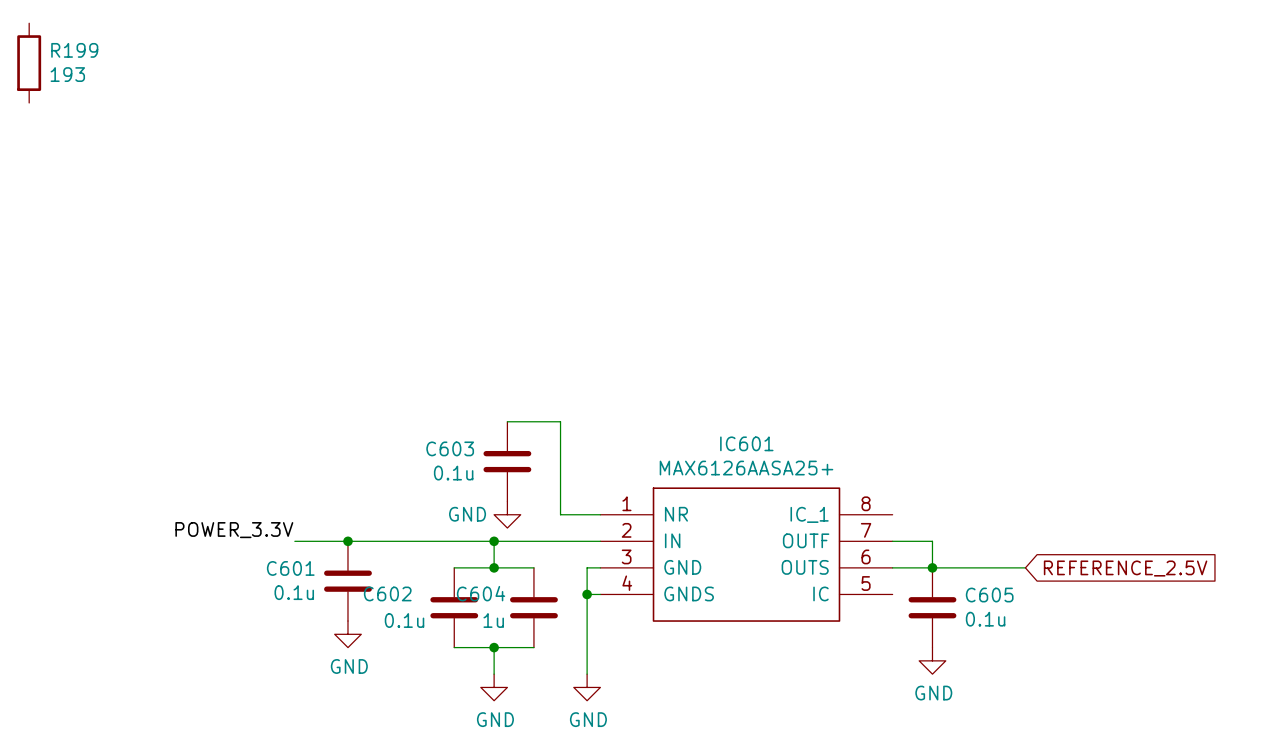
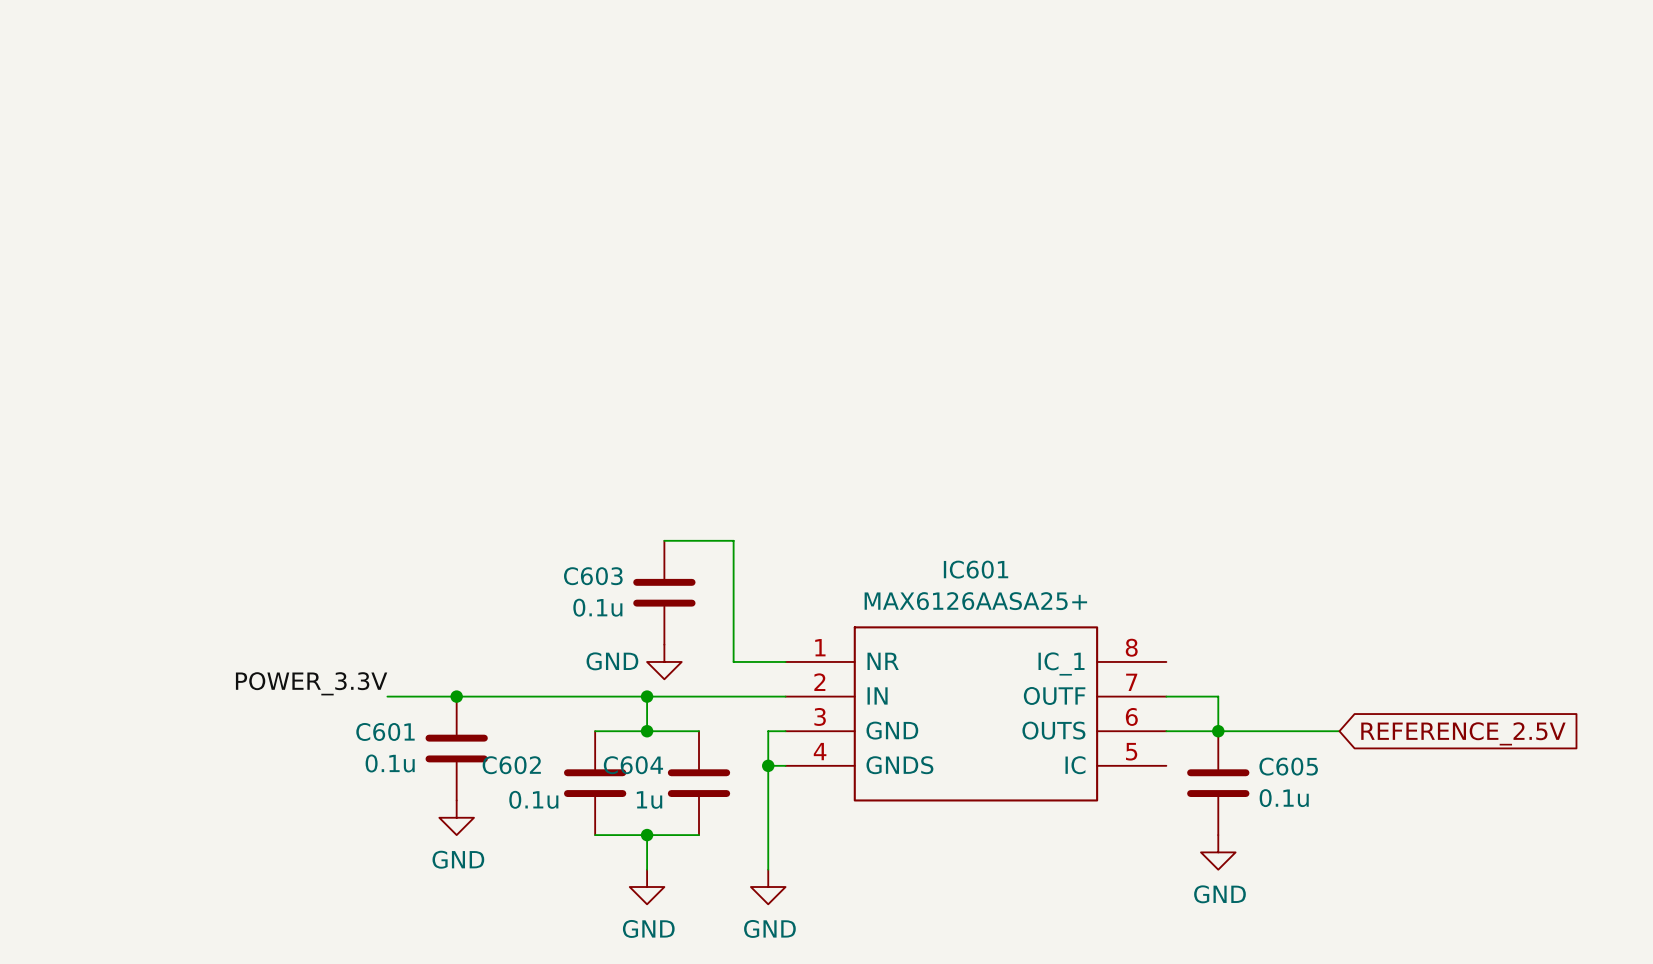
R199: 193 (29, 63) -> none

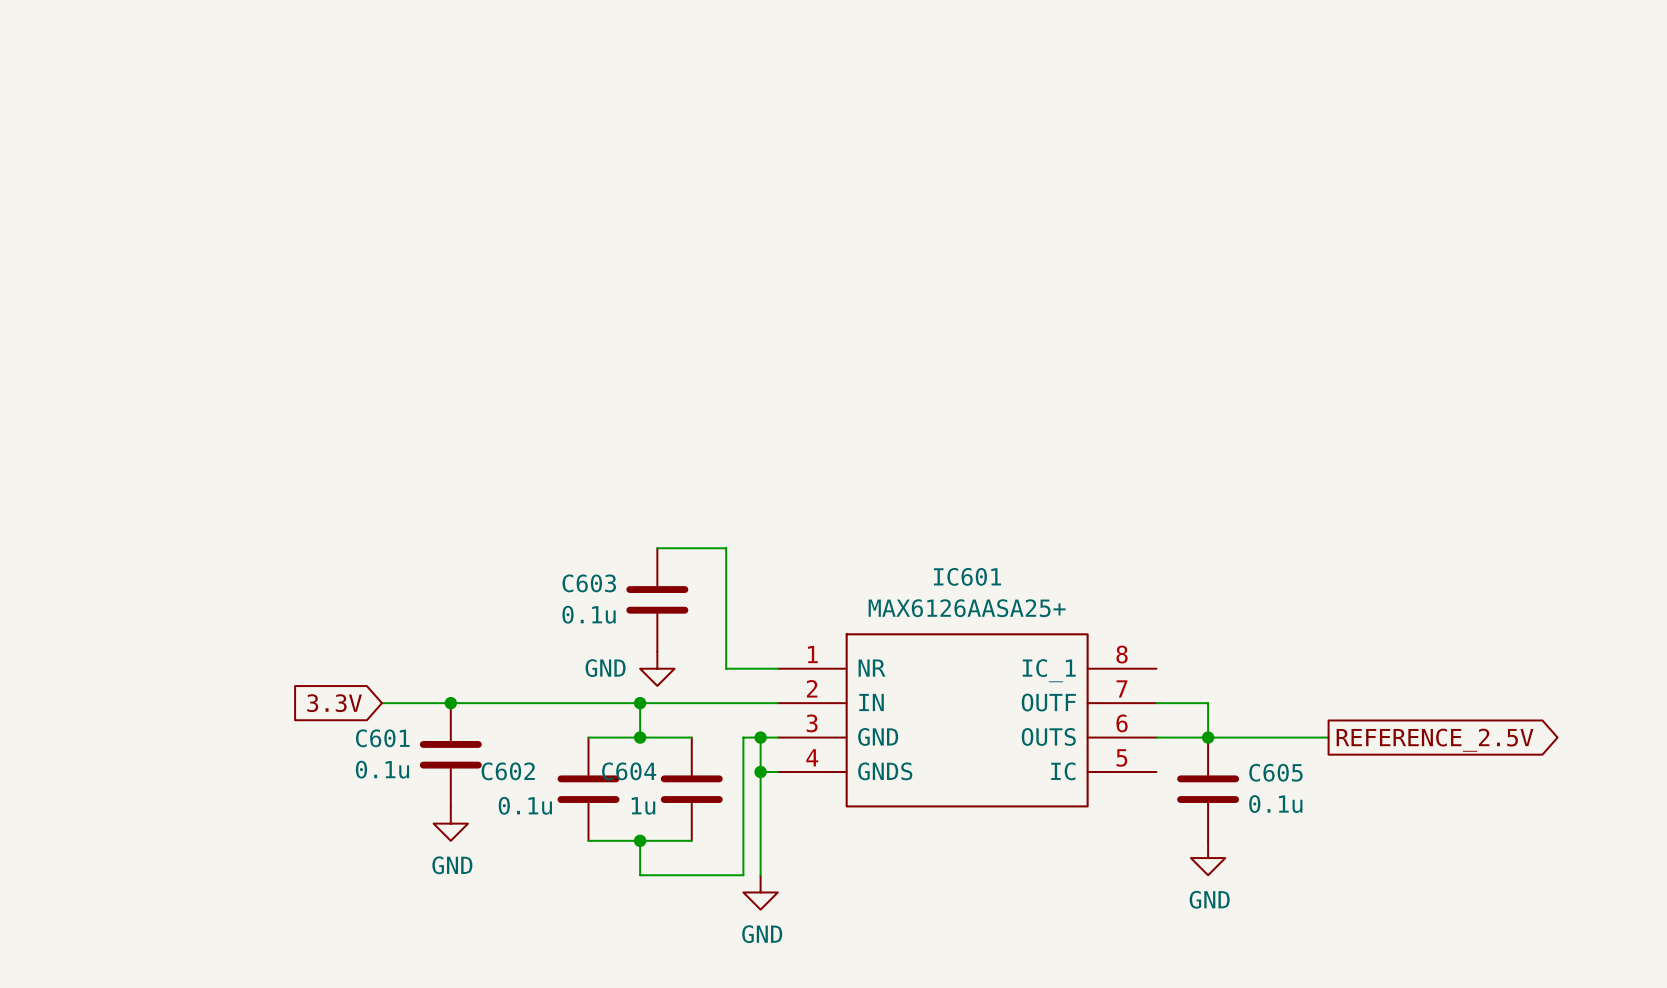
label: POWER_3.3V (311, 683) -> none
global label: none -> 3.3V (334, 703)
wire: none -> (760, 737) (743, 737) (743, 875) (640, 875)
junction: none -> (760, 737)
global label shape: input (1463, 733) -> output (1435, 740)
power symbol: GND (647, 887) -> none

